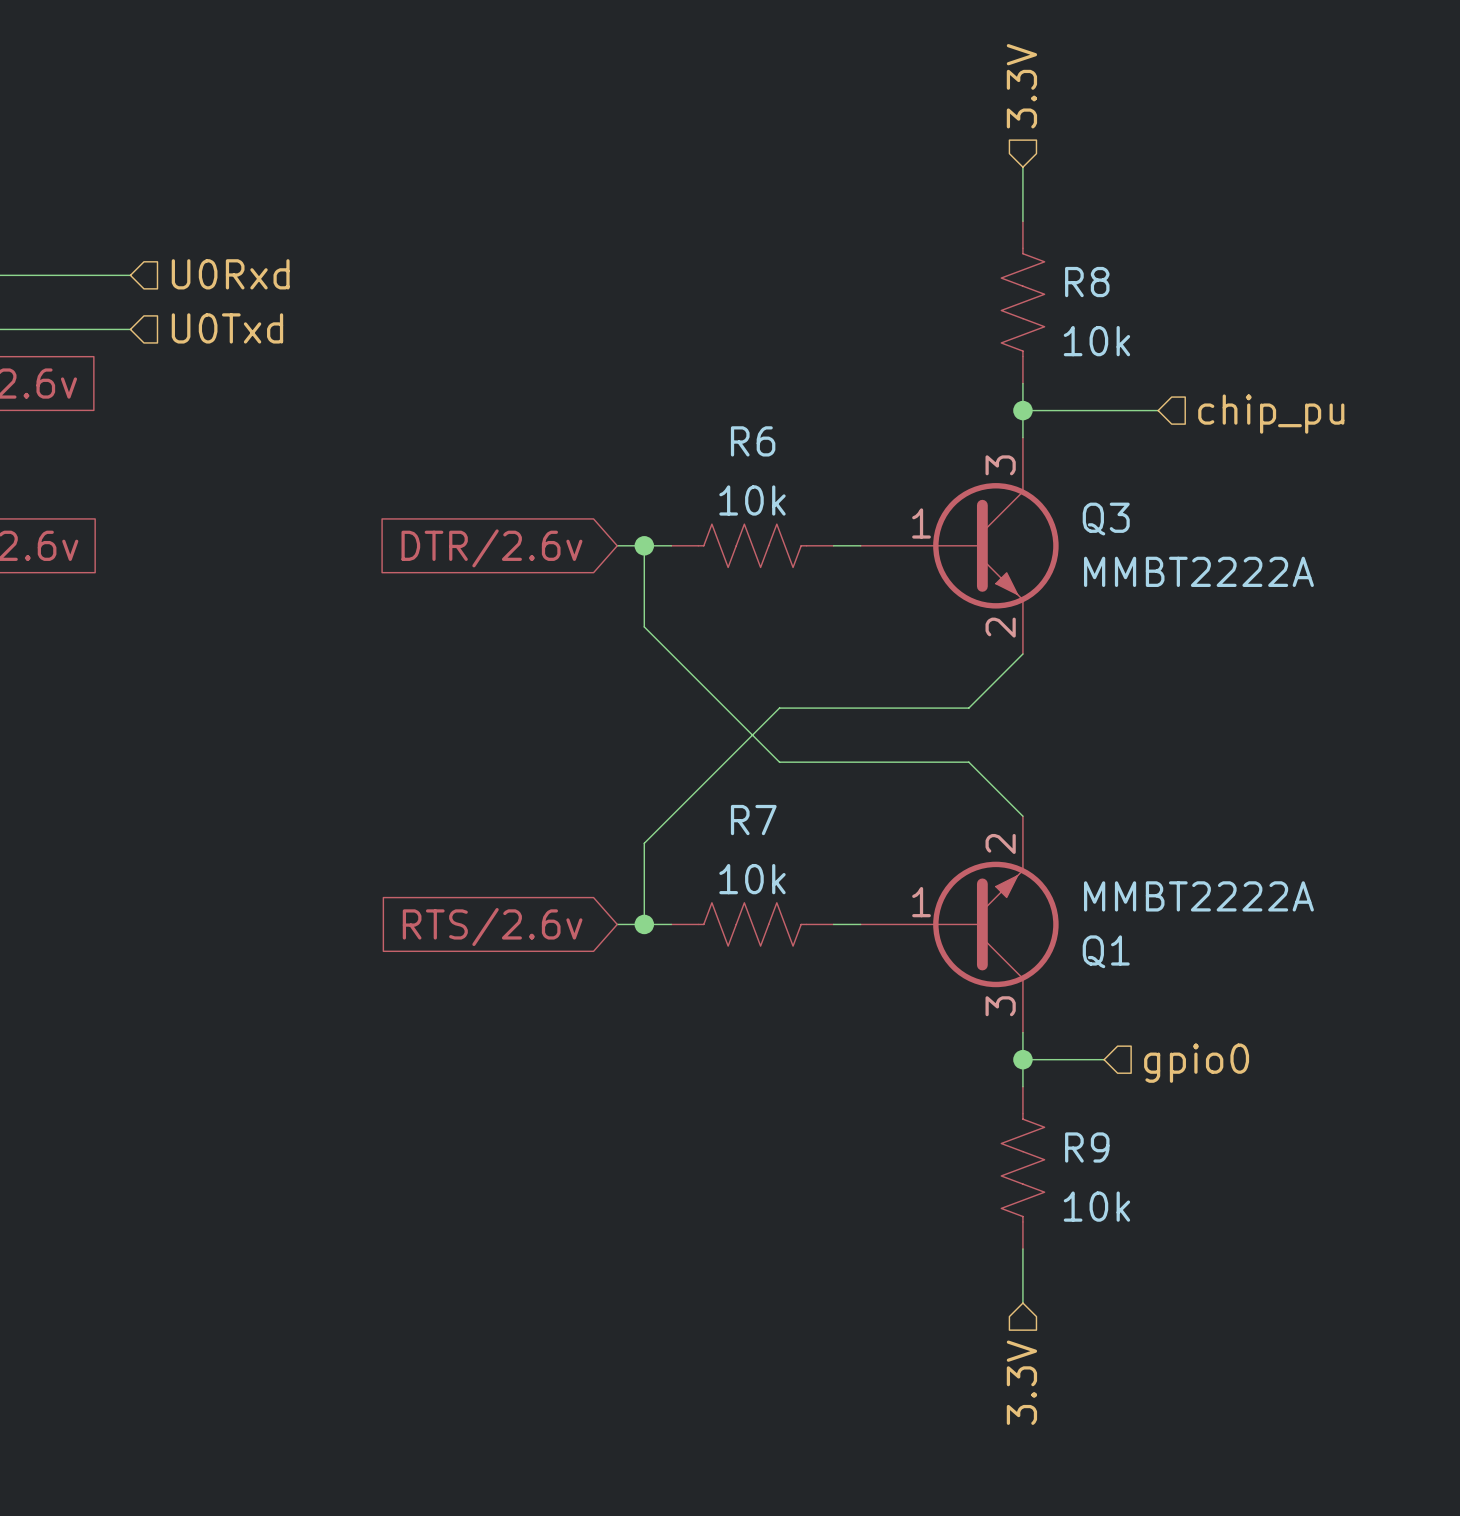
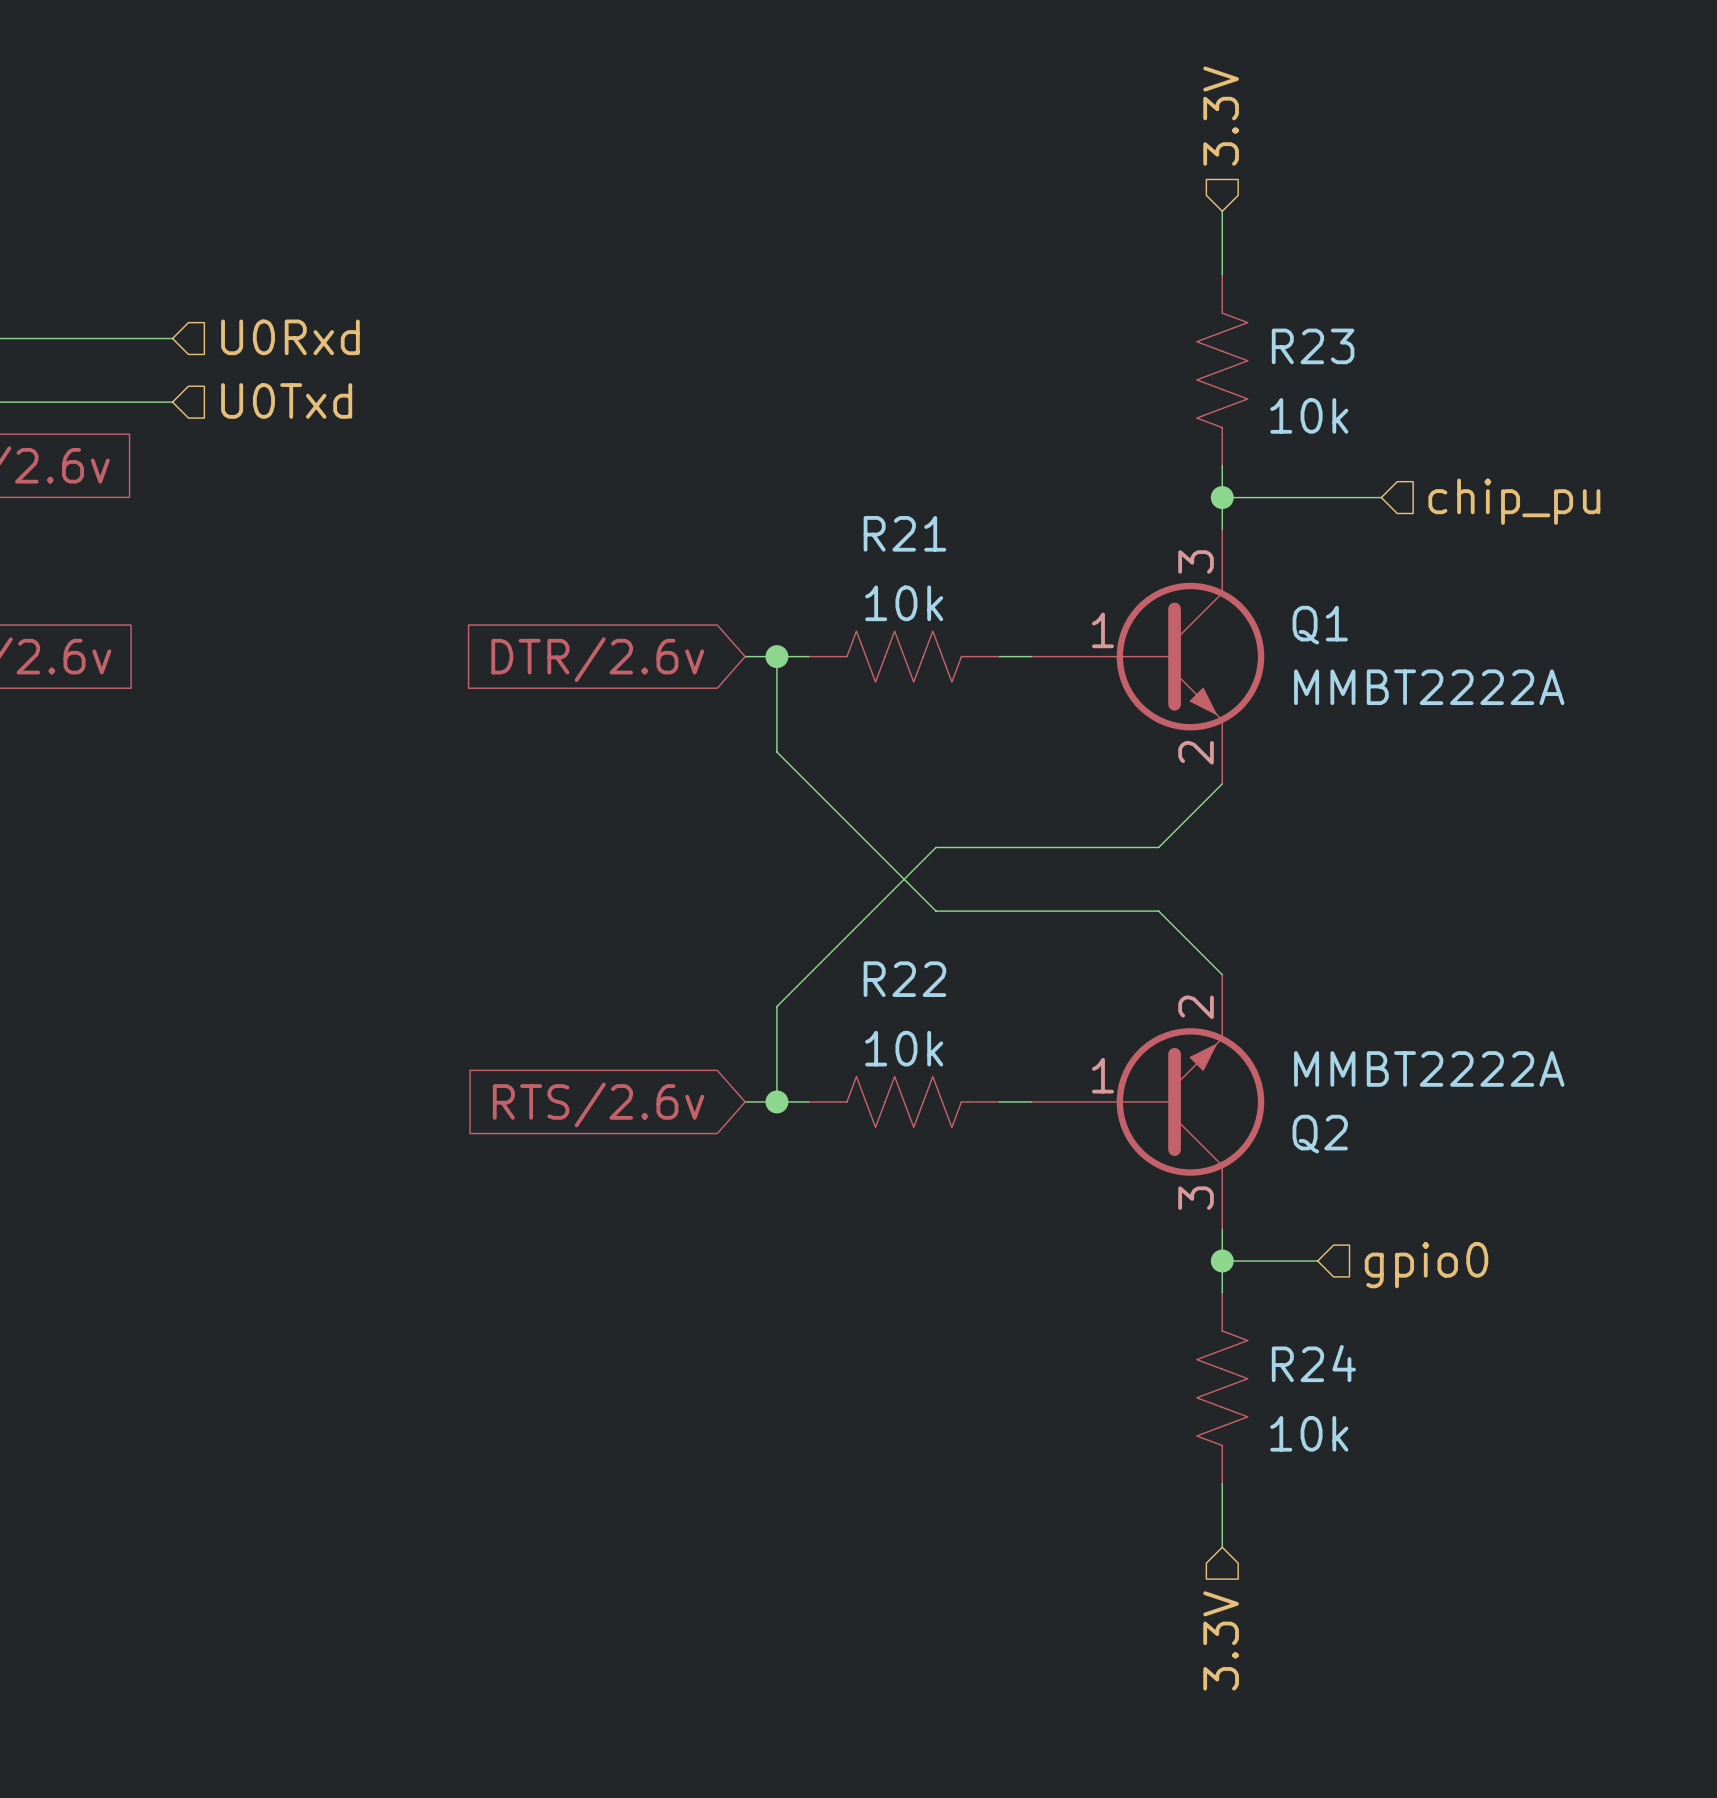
R8 name: R8 (1087, 282) -> R23 (1313, 346)
R6 name: R6 (753, 441) -> R21 (904, 533)
Q3 name: Q3 (1106, 519) -> Q1 (1320, 625)
R7 name: R7 (753, 820) -> R22 (904, 979)
Q1 name: Q1 (1106, 951) -> Q2 (1320, 1134)
R9 name: R9 (1087, 1147) -> R24 (1313, 1363)

